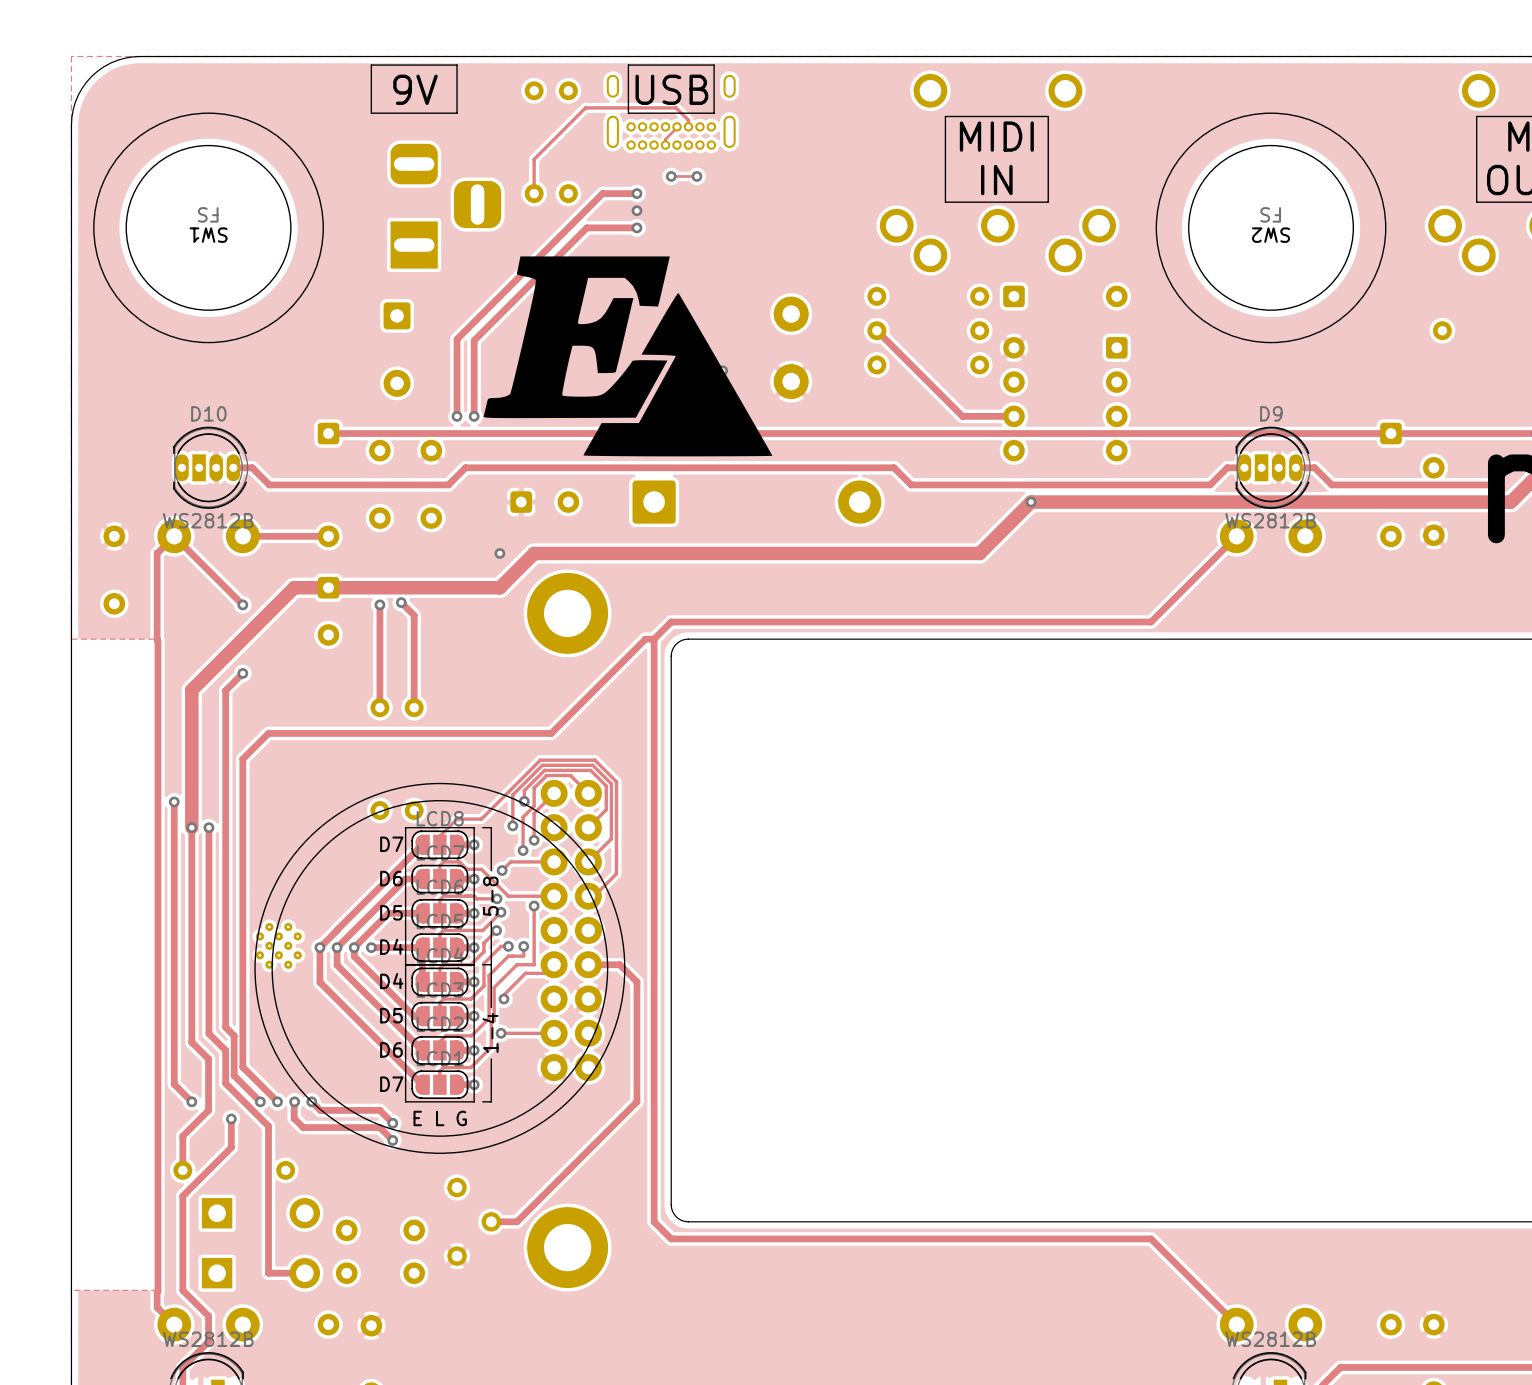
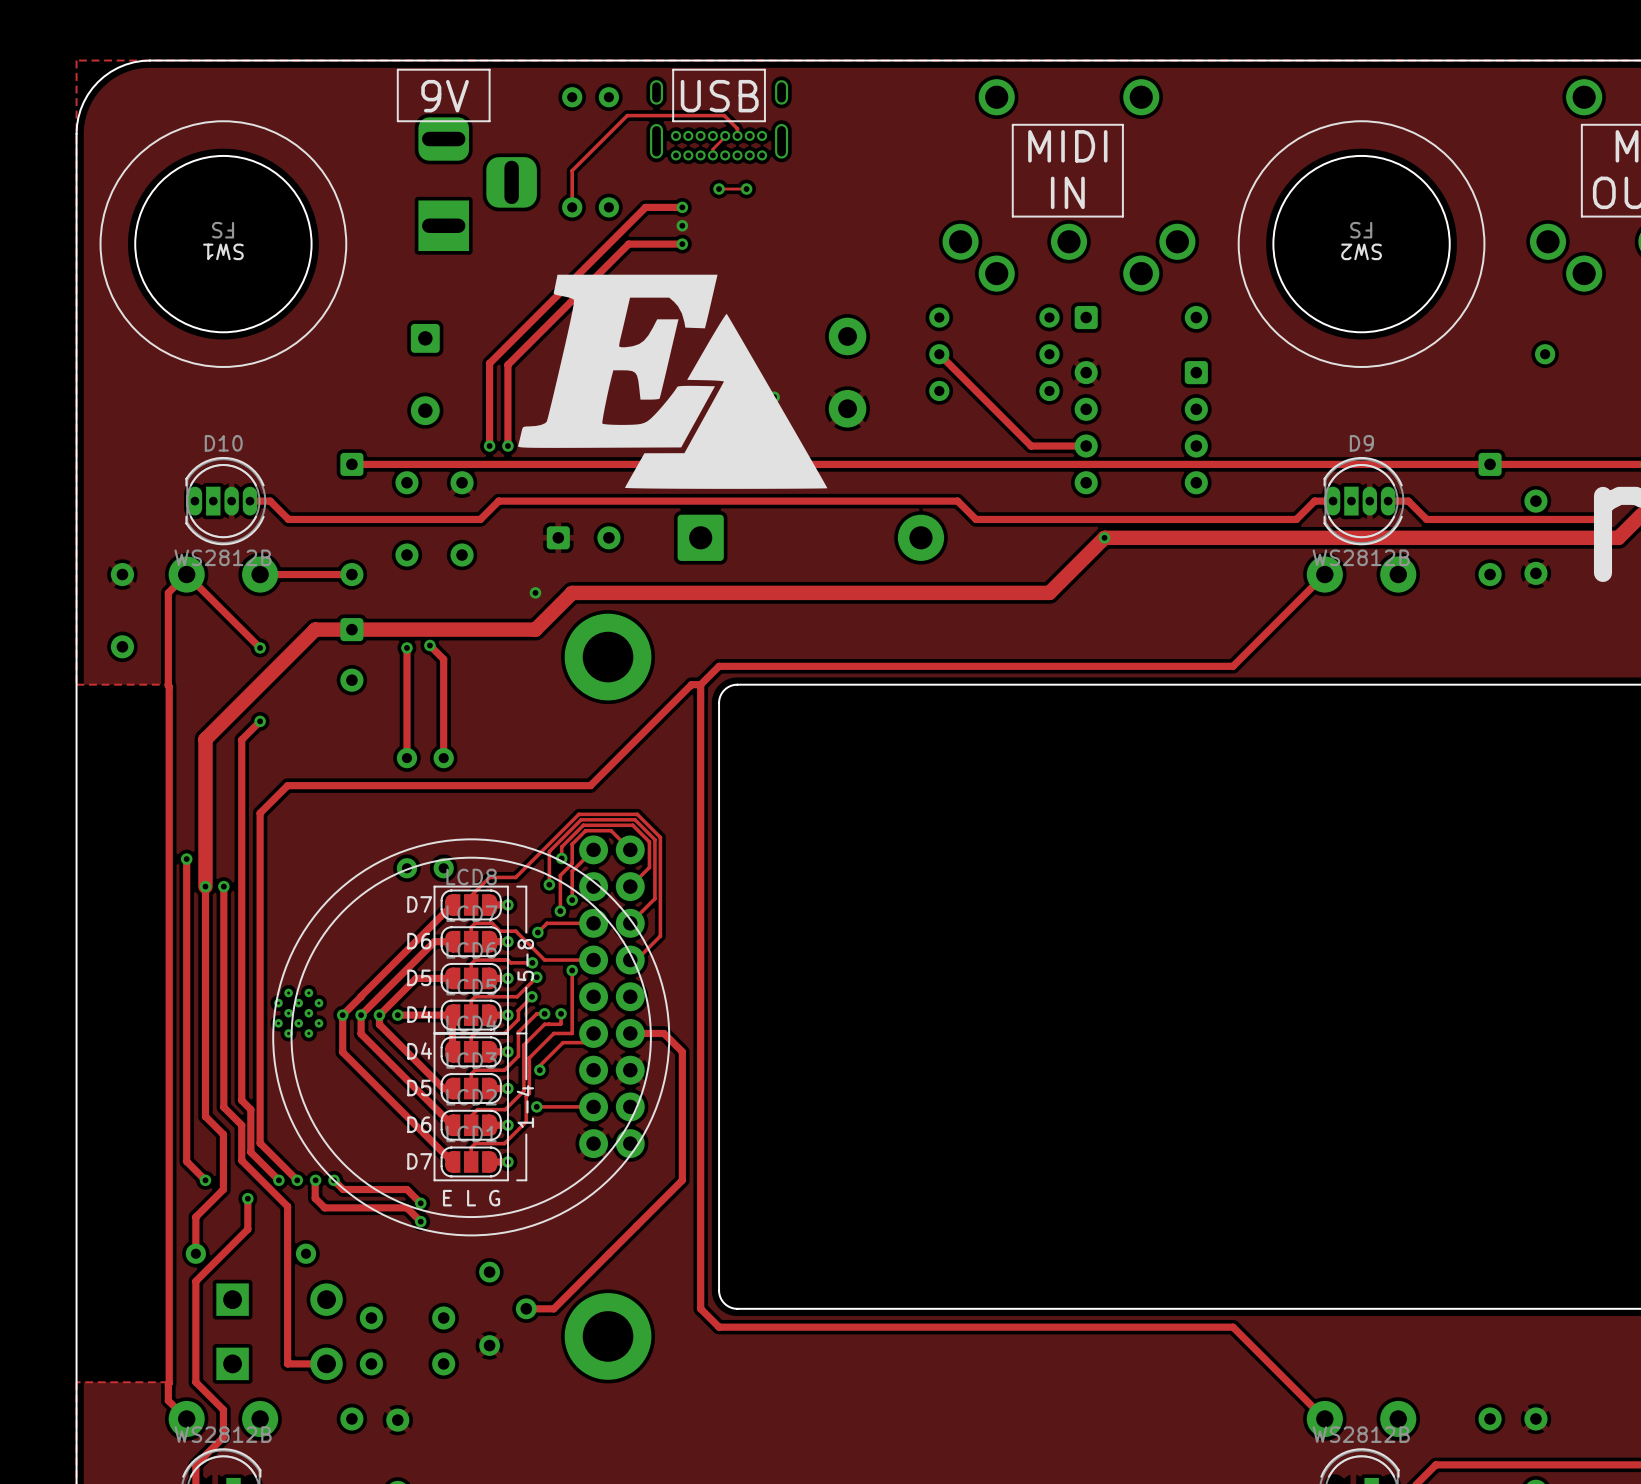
part position: (445, 206) -> (477, 184)

